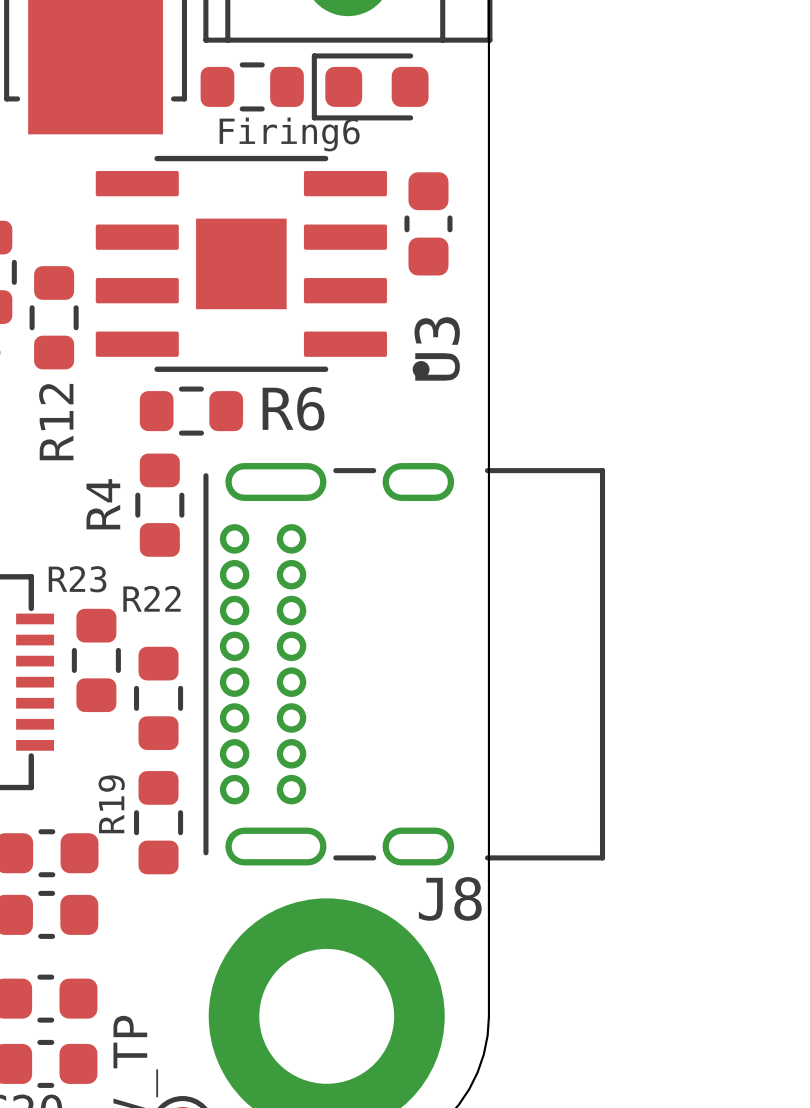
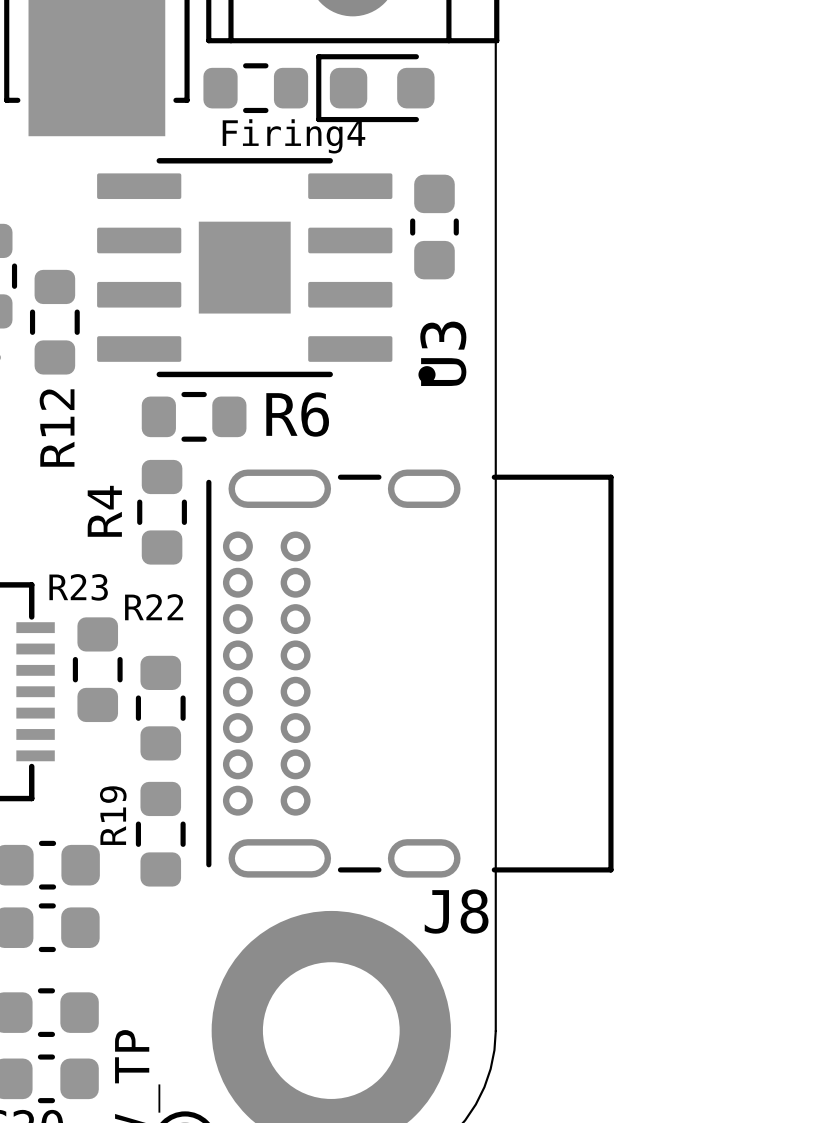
Firing6 name: Firing6 (289, 134) -> Firing4 (293, 136)

